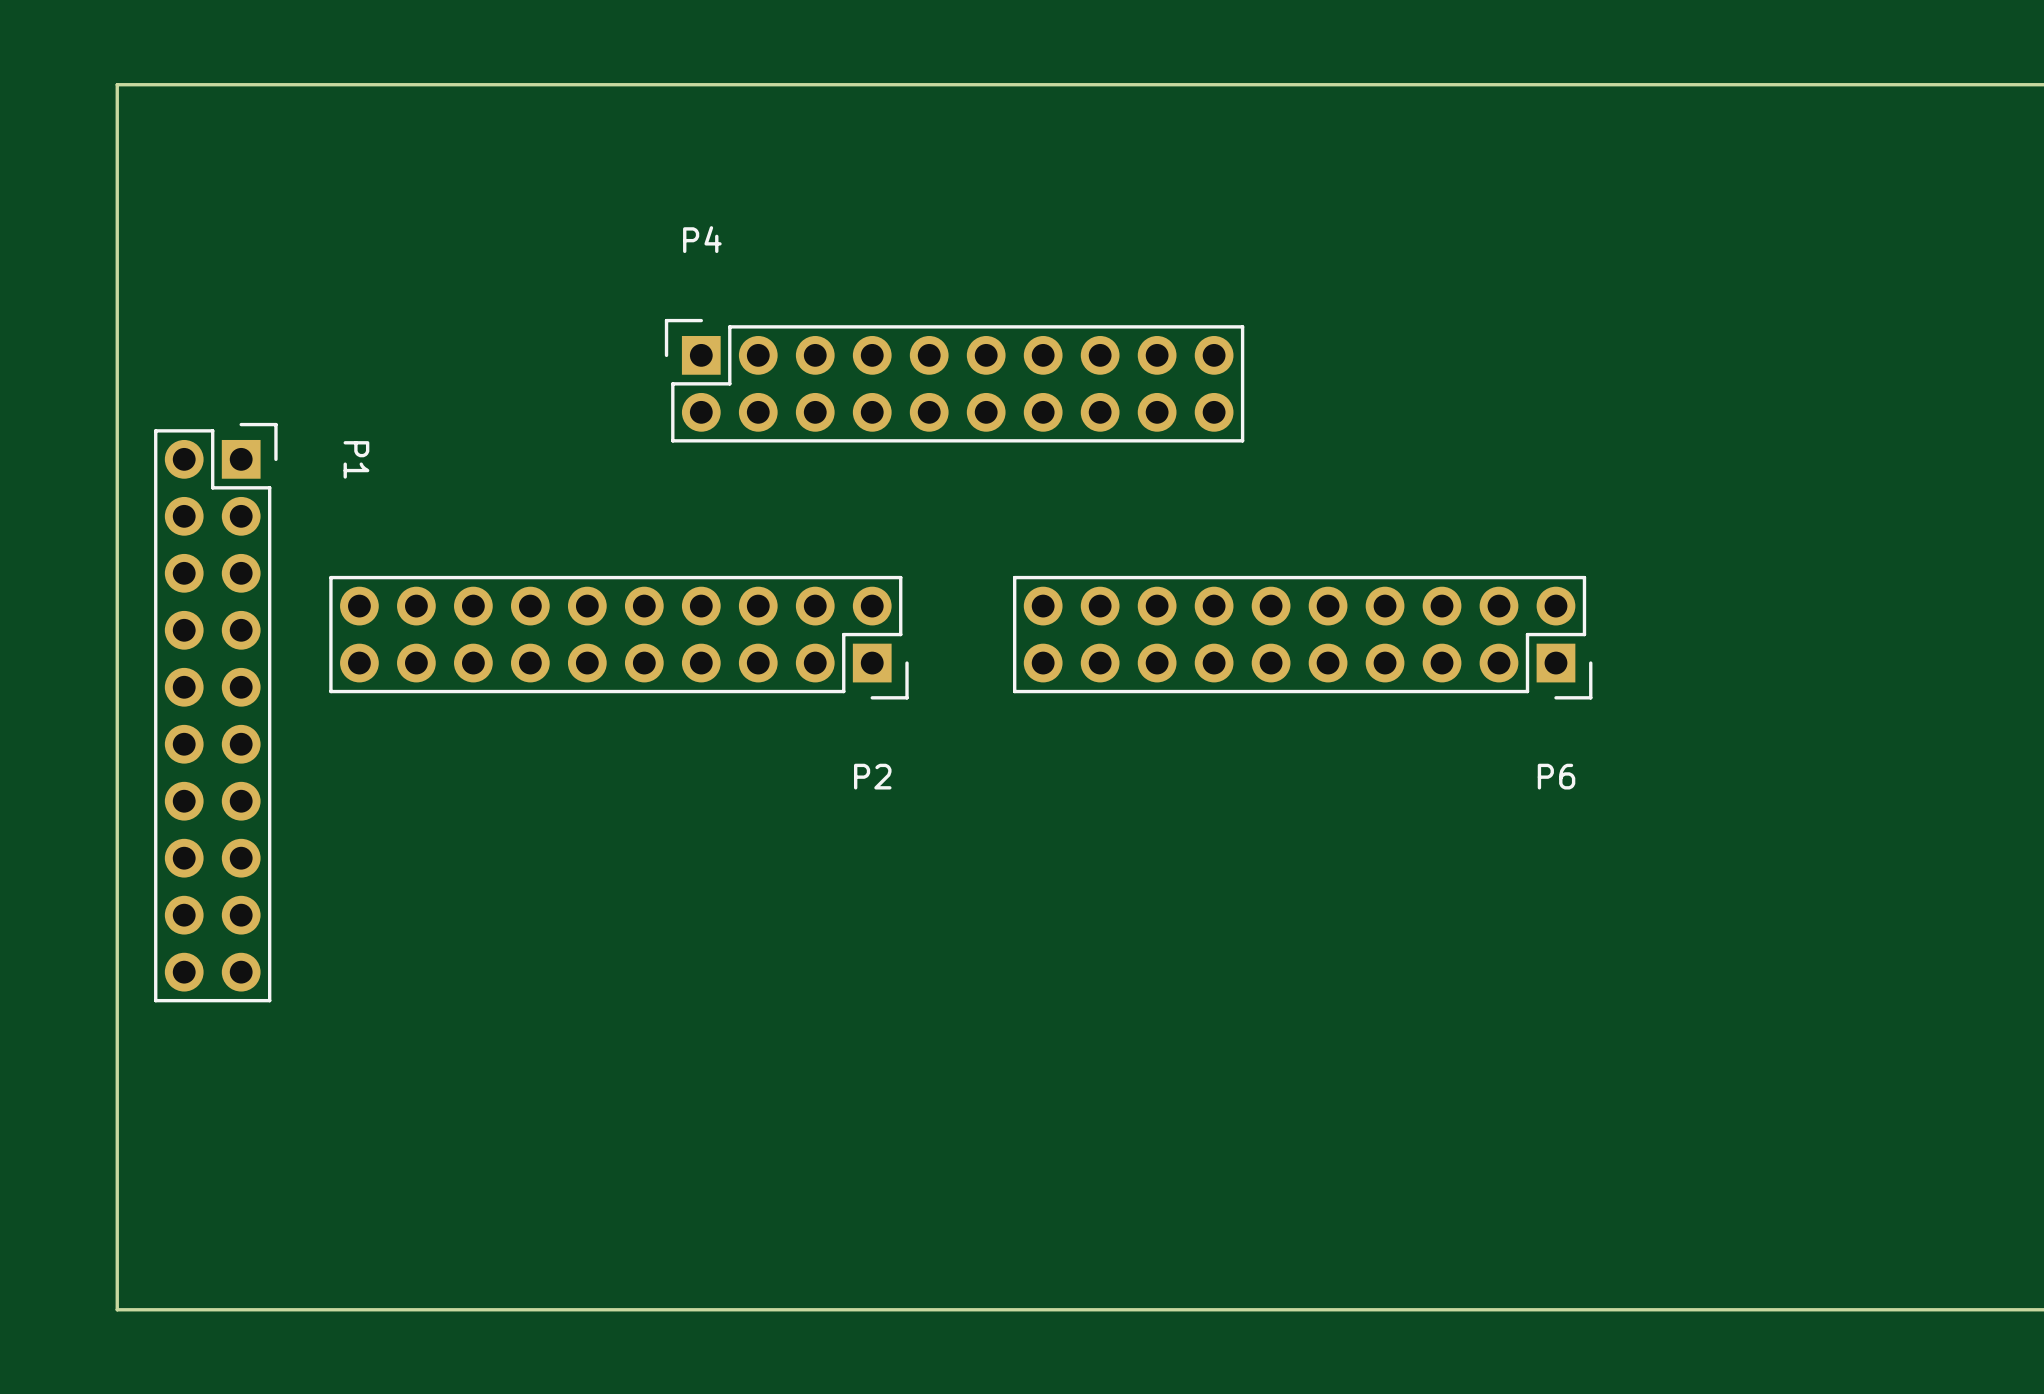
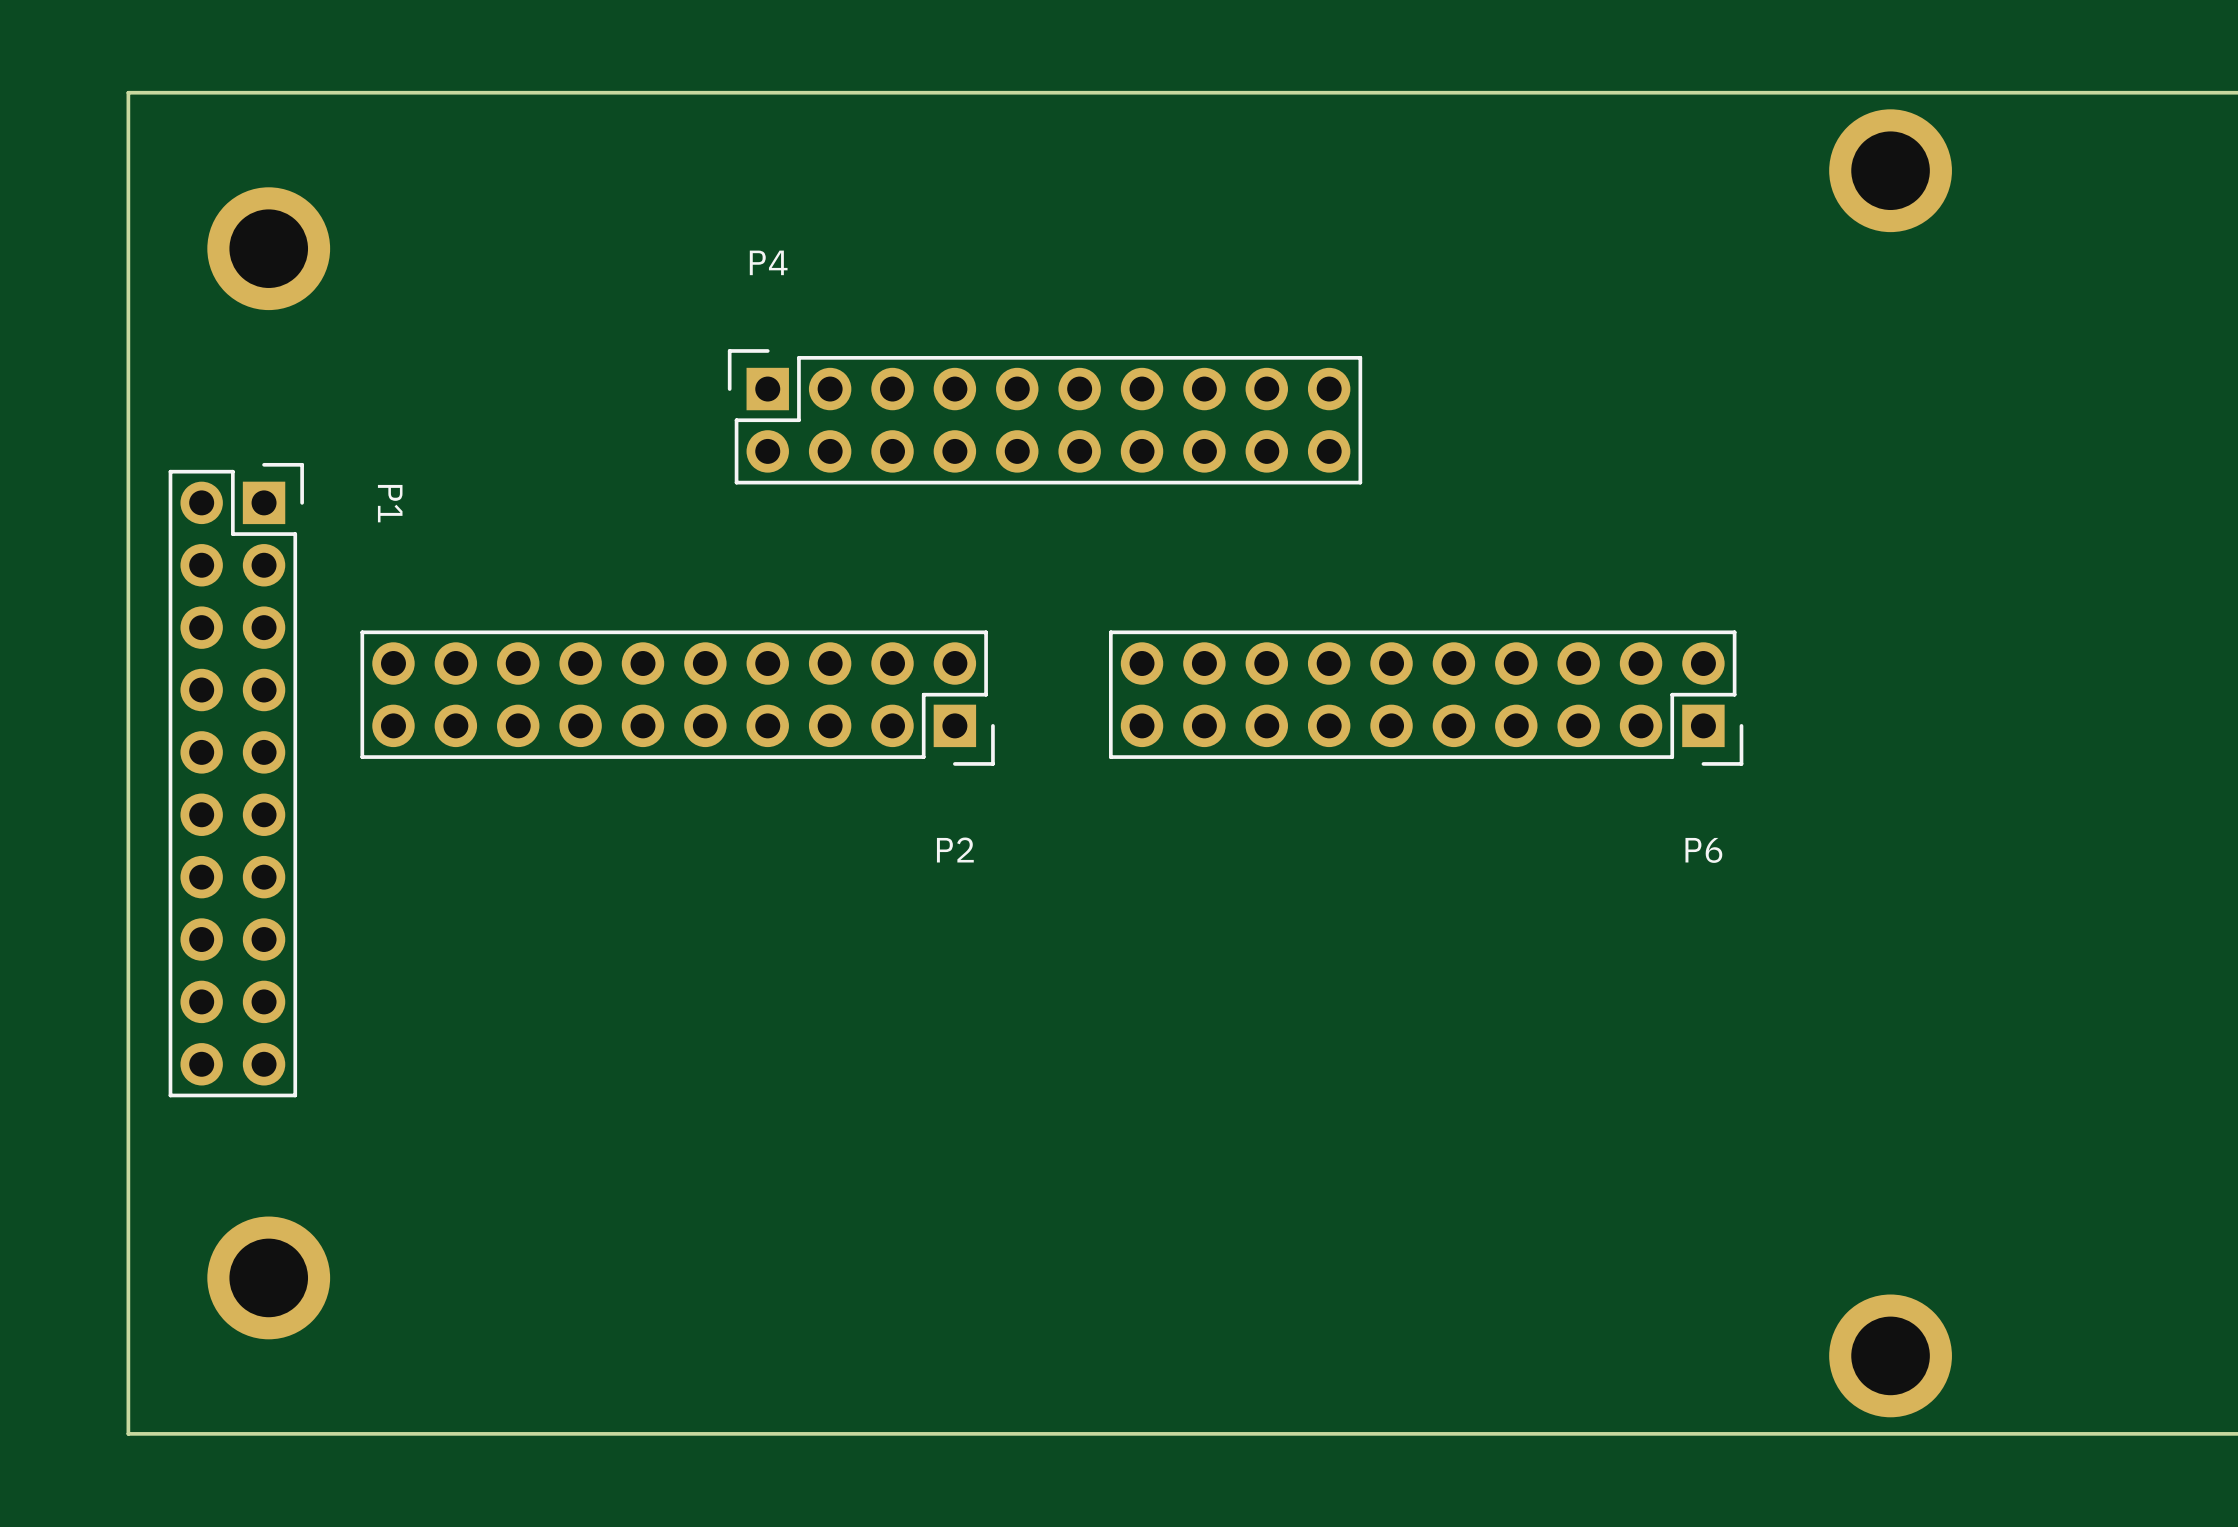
part: none -> (1890, 170)
part: none -> (268, 248)
part: none -> (268, 1277)
part: none -> (1890, 1355)

